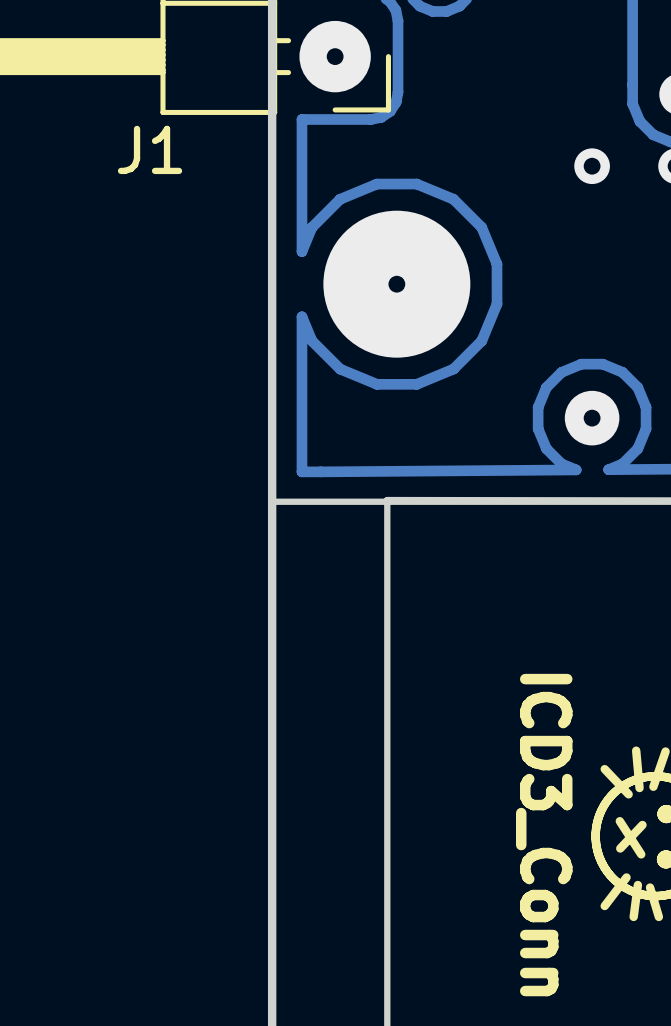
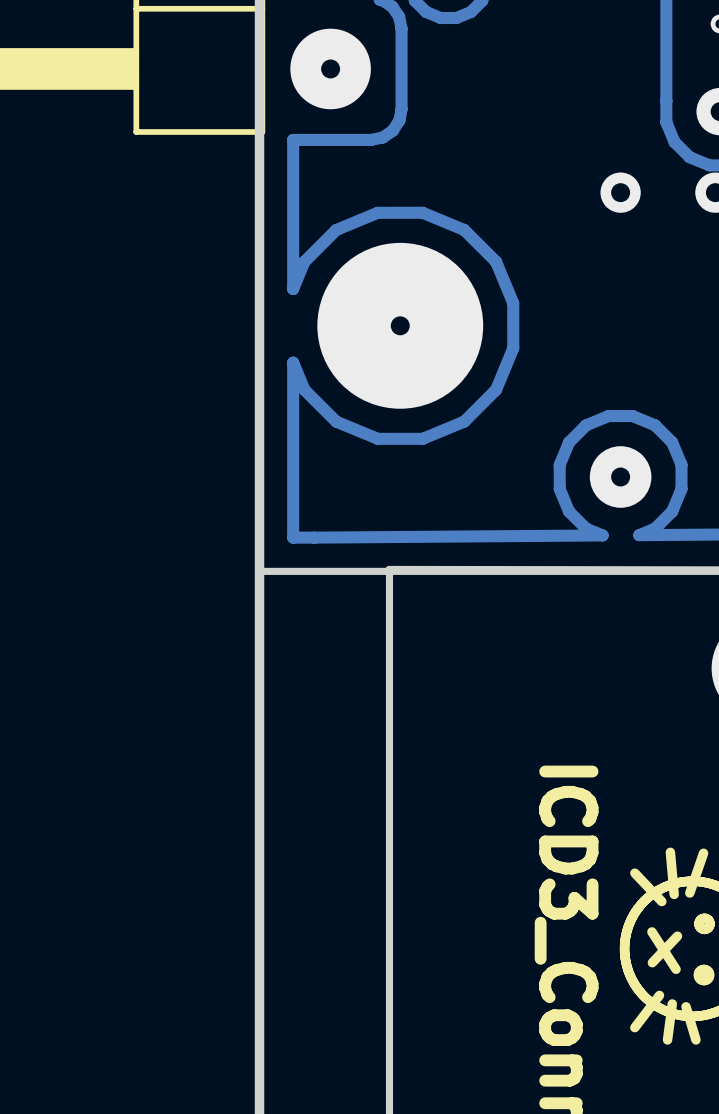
line: (288, 40) (274, 40) -> none
line: (388, 56) (388, 109) (335, 109) -> none
line: (288, 72) (274, 72) -> none
line: (137, 128) (137, 158) (135, 164) (131, 168) (121, 170) -> none
line: (155, 140) (167, 128) (167, 170) -> none
line: (179, 170) (155, 170) -> none

